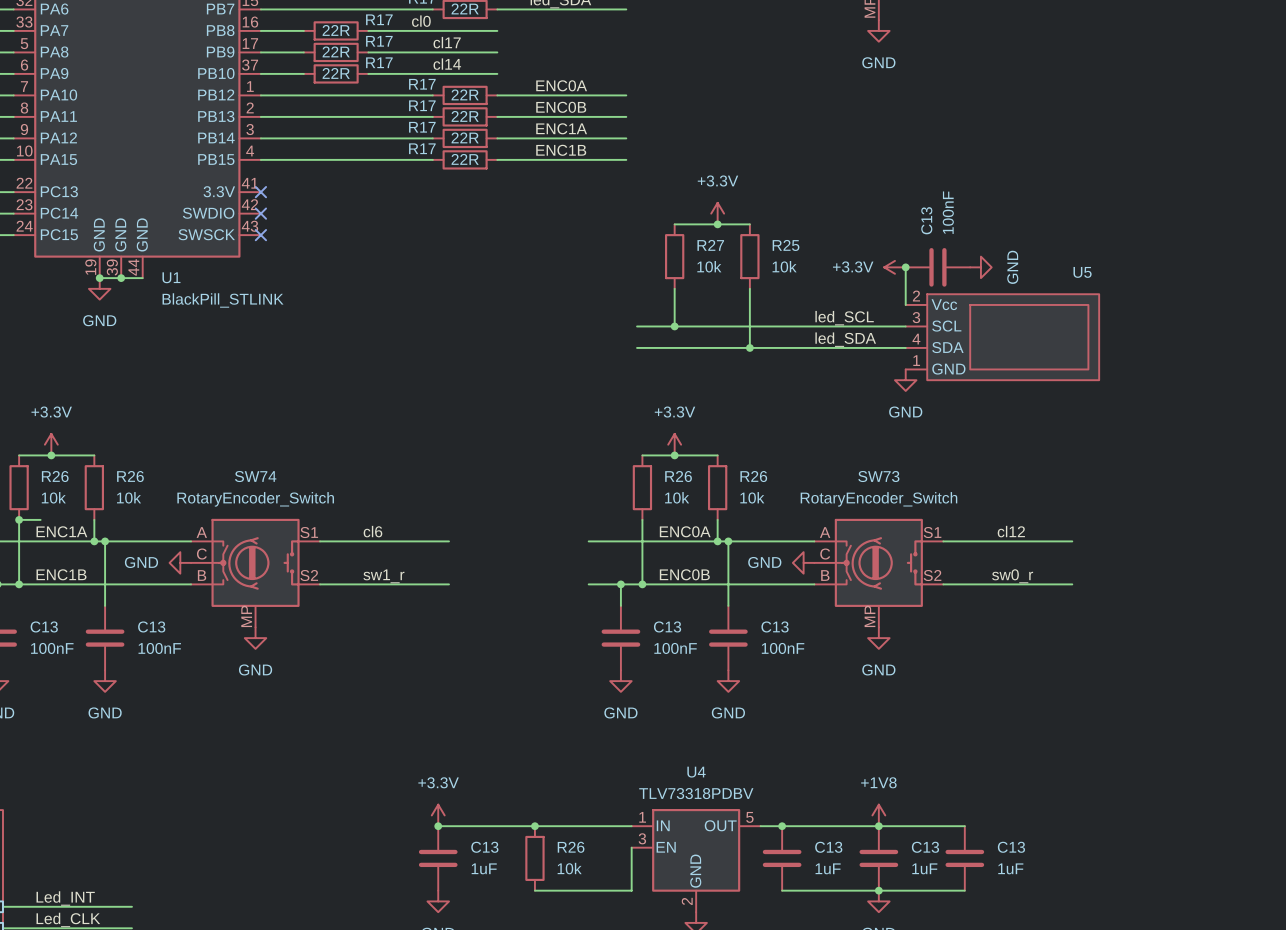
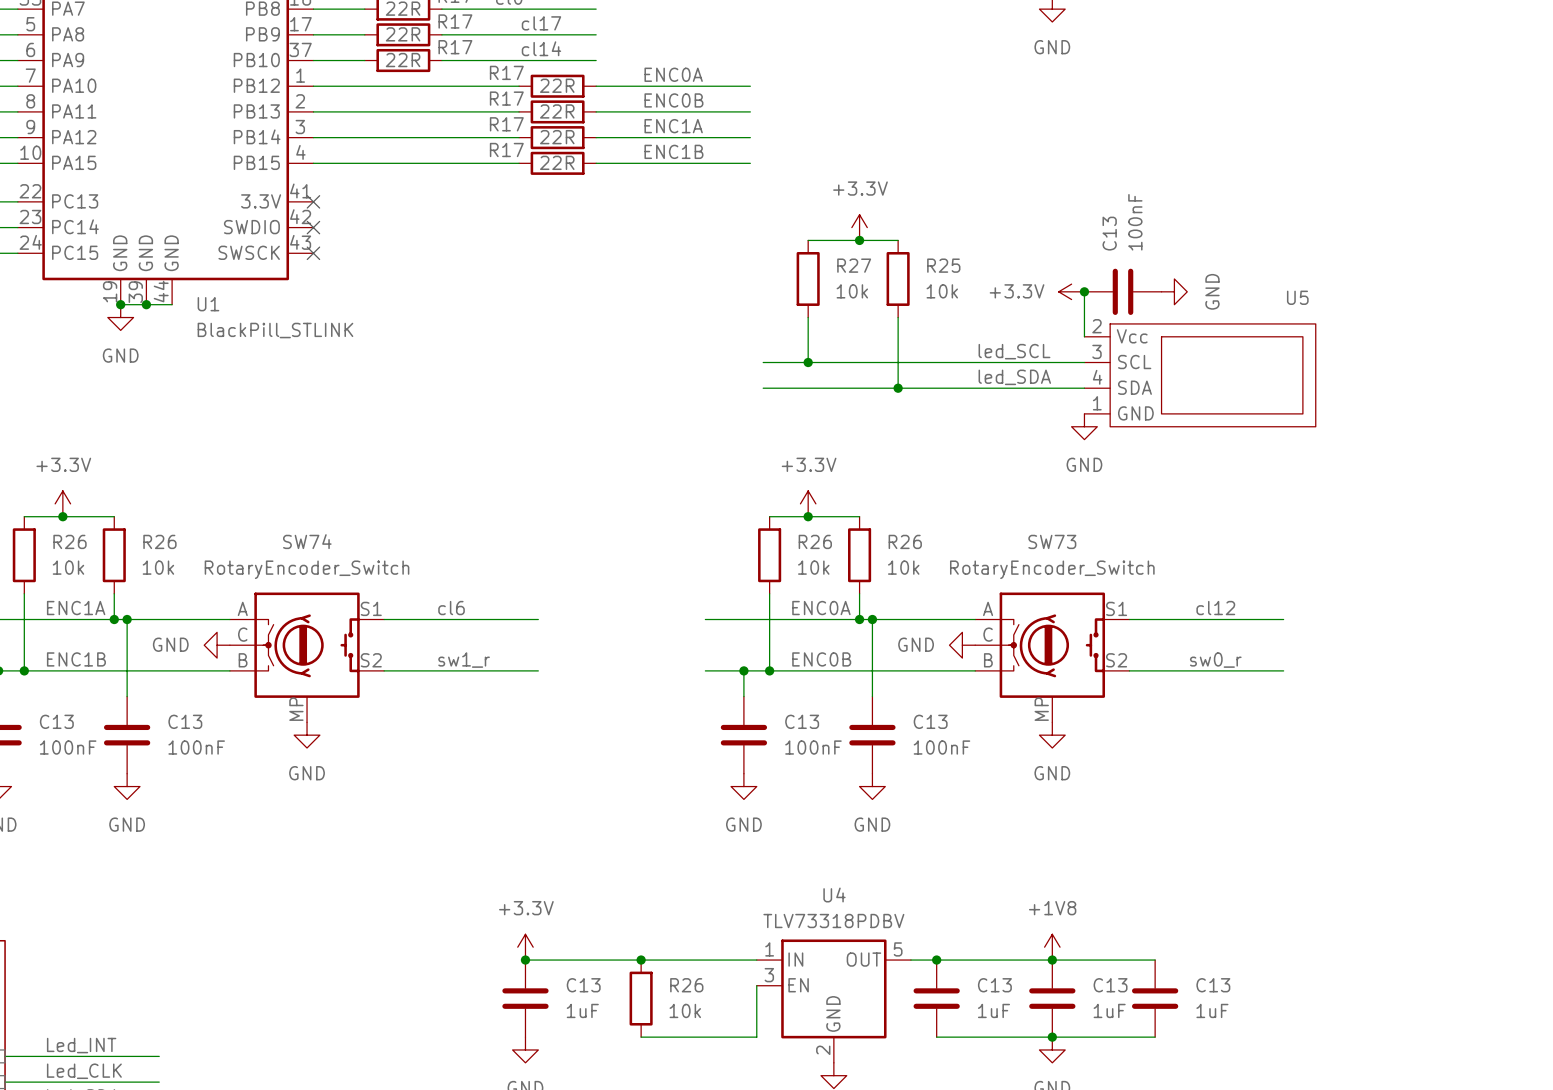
wire: (19, 519) (40, 519) -> none
junction: (19, 519) -> none

